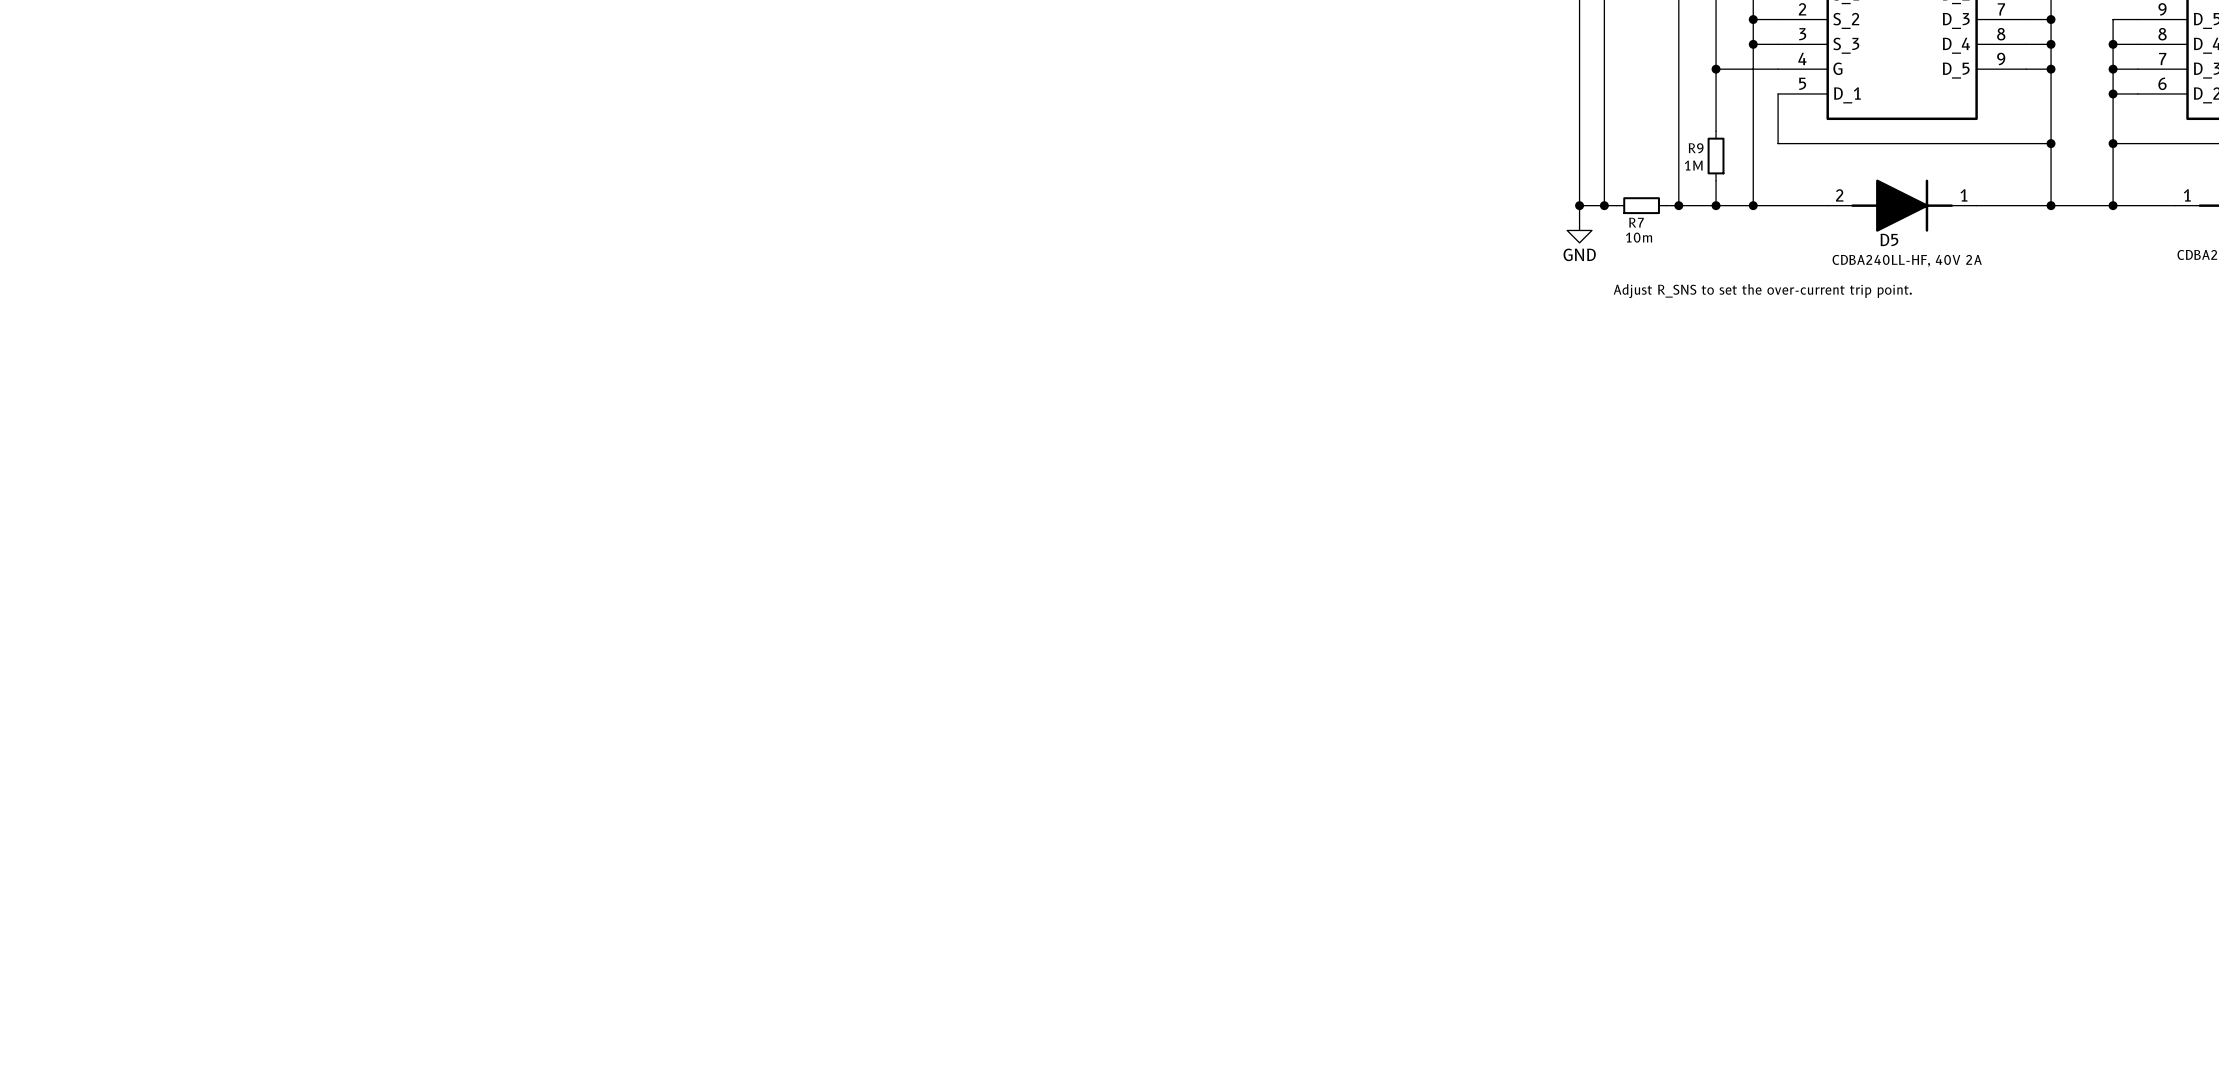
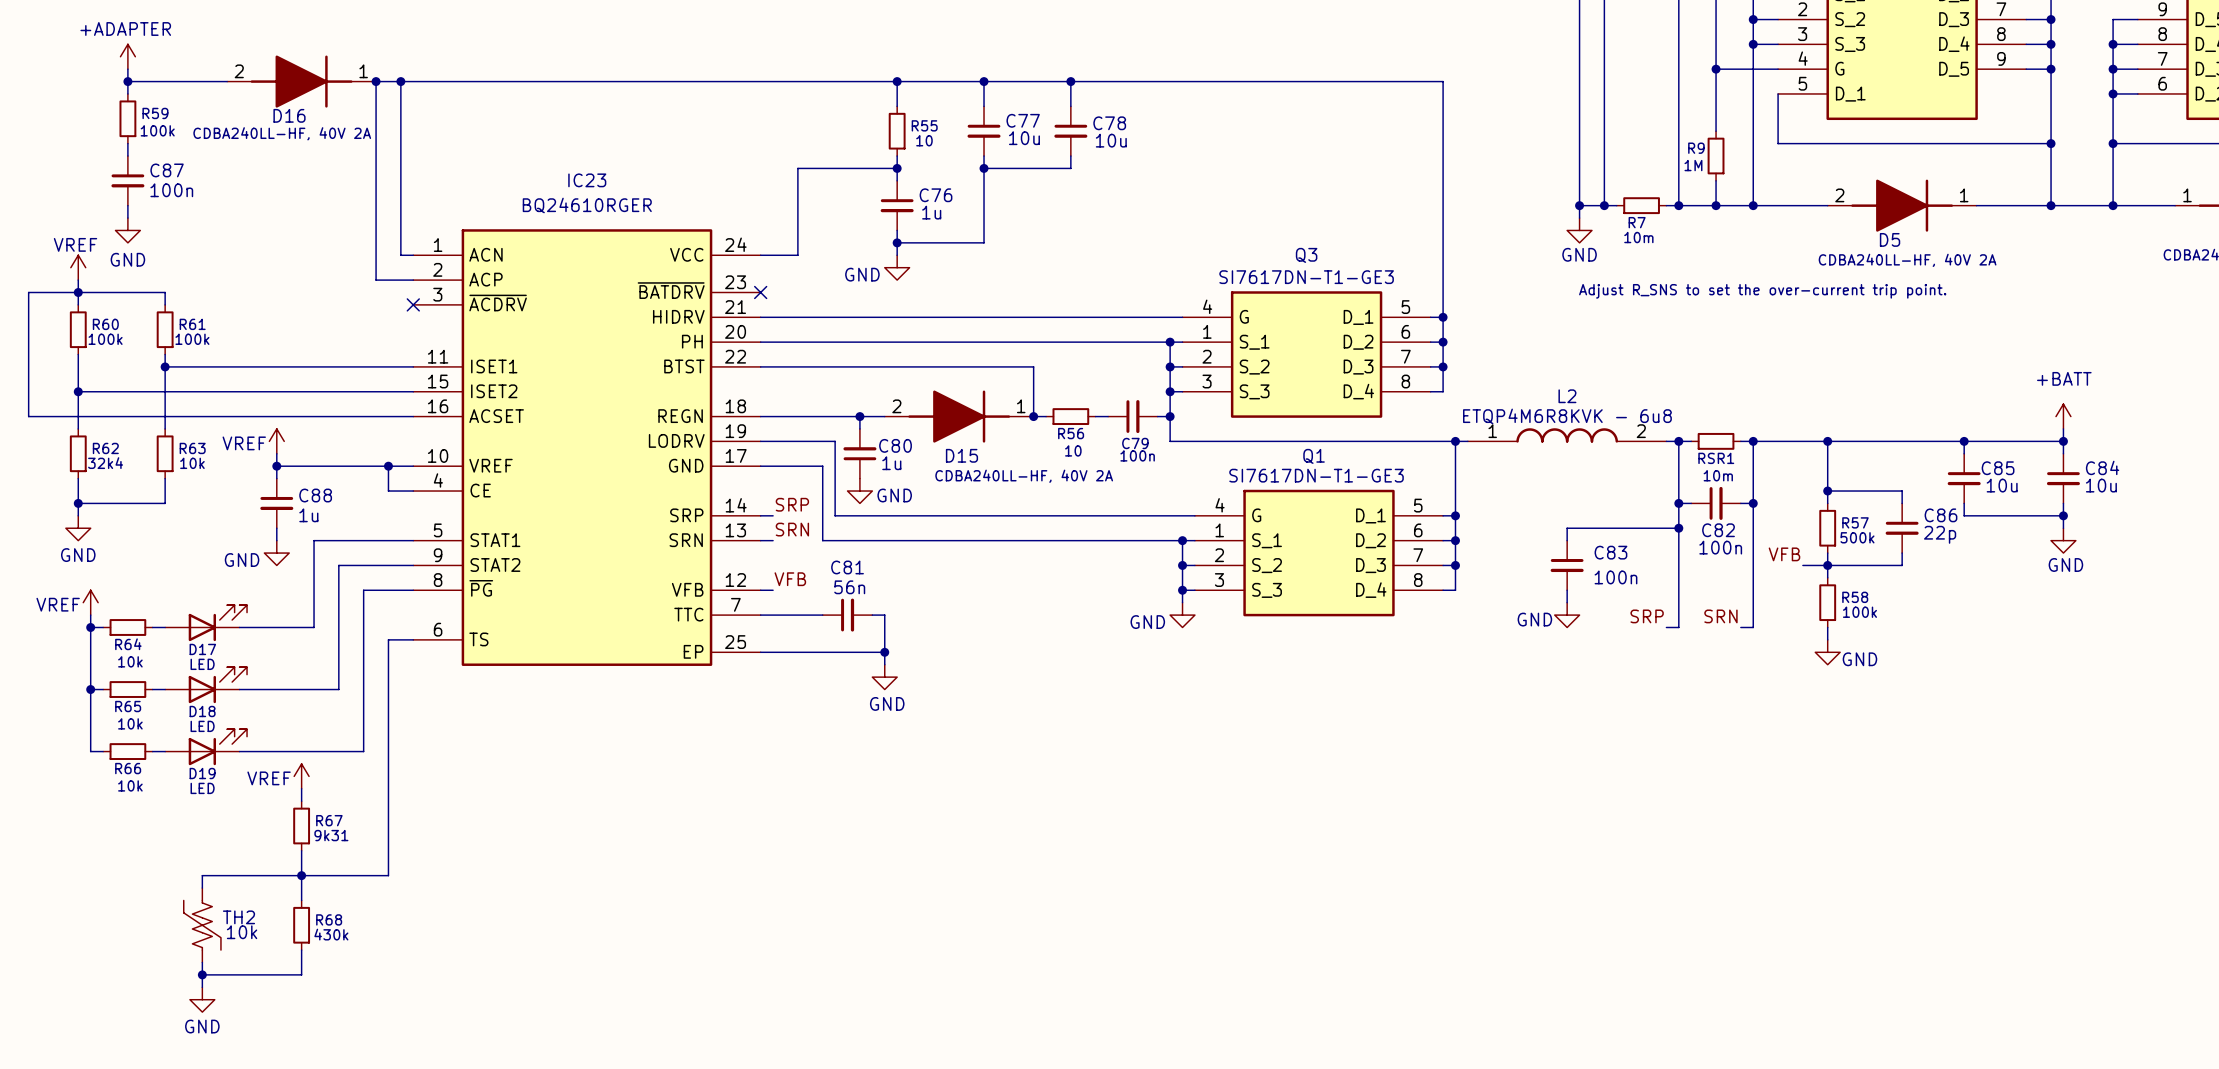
power symbol: none -> +ADAPTER (127, 56)
wire: none -> (127, 69) (127, 93)
wire: none -> (127, 81) (227, 81)
junction: none -> (127, 81)
D16: none -> CDBA240LL-HF, 40V 2A (301, 81)
junction: none -> (376, 81)
wire: none -> (400, 81) (400, 255) (413, 255)
junction: none -> (400, 81)
wire: none -> (897, 81) (897, 106)
junction: none -> (897, 81)
wire: none -> (984, 81) (984, 106)
junction: none -> (984, 81)
wire: none -> (1070, 81) (1070, 106)
junction: none -> (1070, 81)
R59: none -> 100k (127, 118)
R55: none -> 10 (897, 131)
C77: none -> 10u (984, 131)
C78: none -> 10u (1070, 131)
wire: none -> (127, 143) (127, 156)
wire: none -> (897, 156) (897, 180)
wire: none -> (984, 156) (984, 242) (897, 242)
wire: none -> (1070, 156) (1070, 168) (984, 168)
wire: none -> (897, 168) (797, 168) (797, 255) (760, 255)
junction: none -> (897, 168)
junction: none -> (984, 168)
C87: none -> 100n (127, 180)
wire: none -> (127, 205) (127, 218)
C76: none -> 1u (897, 205)
power symbol: none -> GND (127, 230)
wire: none -> (897, 230) (897, 255)
junction: none -> (897, 242)
power symbol: none -> VREF (78, 267)
power symbol: none -> GND (897, 267)
wire: none -> (78, 280) (78, 304)
wire: none -> (413, 280) (376, 280) (376, 81) (1443, 81) (1443, 391) (1430, 391)
junction: none -> (78, 292)
no-connect mark: none -> (760, 292)
wire: none -> (165, 304) (165, 292) (28, 292) (28, 416) (413, 416)
no-connect mark: none -> (413, 304)
wire: none -> (760, 317) (1182, 317)
wire: none -> (1430, 317) (1443, 317)
junction: none -> (1443, 317)
R60: none -> 100k (78, 329)
R61: none -> 100k (165, 329)
wire: none -> (760, 342) (1182, 342)
wire: none -> (1170, 342) (1170, 441) (1467, 441)
junction: none -> (1170, 342)
wire: none -> (1430, 342) (1443, 342)
junction: none -> (1443, 342)
wire: none -> (78, 354) (78, 428)
wire: none -> (165, 354) (165, 428)
Q3: none -> SI7617DN-T1-GE3 (1306, 354)
wire: none -> (165, 366) (413, 366)
junction: none -> (165, 366)
wire: none -> (760, 366) (1033, 366) (1033, 416) (1046, 416)
wire: none -> (1170, 366) (1182, 366)
junction: none -> (1170, 366)
wire: none -> (1430, 366) (1443, 366)
junction: none -> (1443, 366)
wire: none -> (78, 391) (413, 391)
junction: none -> (78, 391)
wire: none -> (1170, 391) (1182, 391)
junction: none -> (1170, 391)
wire: none -> (760, 416) (884, 416)
wire: none -> (859, 416) (859, 428)
junction: none -> (859, 416)
D15: none -> CDBA240LL-HF, 40V 2A (959, 416)
junction: none -> (1033, 416)
R56: none -> 10 (1070, 416)
wire: none -> (1095, 416) (1108, 416)
C79: none -> 100n (1132, 416)
wire: none -> (1157, 416) (1170, 416)
junction: none -> (1170, 416)
power symbol: none -> +BATT (2063, 416)
wire: none -> (2063, 428) (2063, 453)
L2: none -> ETQP4M6R8KVK - 6u8 (1567, 435)
power symbol: none -> VREF (276, 441)
wire: none -> (760, 441) (835, 441) (835, 515) (1194, 515)
wire: none -> (1455, 441) (1455, 590) (1443, 590)
junction: none -> (1455, 441)
wire: none -> (1666, 441) (1691, 441)
wire: none -> (1678, 441) (1678, 627) (1666, 627)
junction: none -> (1678, 441)
RSR1: none -> 10m (1716, 441)
wire: none -> (1740, 441) (2063, 441)
wire: none -> (1753, 441) (1753, 627) (1740, 627)
junction: none -> (1753, 441)
wire: none -> (1827, 441) (1827, 503)
junction: none -> (1827, 441)
wire: none -> (1964, 441) (1964, 453)
junction: none -> (1964, 441)
junction: none -> (2063, 441)
IC23: none -> BQ24610RGER (586, 447)
R62: none -> 32k4 (78, 453)
R63: none -> 10k (165, 453)
wire: none -> (276, 453) (276, 478)
C80: none -> 1u (859, 453)
wire: none -> (276, 466) (413, 466)
junction: none -> (276, 466)
wire: none -> (388, 466) (388, 491) (413, 491)
junction: none -> (388, 466)
wire: none -> (760, 466) (822, 466) (822, 540) (1194, 540)
wire: none -> (78, 478) (78, 515)
wire: none -> (165, 478) (165, 503) (78, 503)
C85: none -> 10u (1964, 478)
C84: none -> 10u (2063, 478)
power symbol: none -> GND (859, 491)
wire: none -> (1827, 491) (1902, 491) (1902, 503)
junction: none -> (1827, 491)
junction: none -> (78, 503)
C88: none -> 1u (276, 503)
wire: none -> (1678, 503) (1691, 503)
junction: none -> (1678, 503)
C82: none -> 100n (1716, 503)
wire: none -> (1740, 503) (1753, 503)
junction: none -> (1753, 503)
wire: none -> (1964, 503) (1964, 515) (2063, 515)
wire: none -> (2063, 503) (2063, 528)
label: none -> SRP (792, 504)
wire: none -> (760, 515) (773, 515)
wire: none -> (1443, 515) (1455, 515)
junction: none -> (1455, 515)
junction: none -> (2063, 515)
power symbol: none -> GND (78, 528)
wire: none -> (276, 528) (276, 540)
wire: none -> (1678, 528) (1567, 528) (1567, 540)
junction: none -> (1678, 528)
R57: none -> 500k (1827, 528)
C86: none -> 22p (1902, 528)
label: none -> SRN (792, 529)
wire: none -> (413, 540) (314, 540) (314, 627) (239, 627)
wire: none -> (760, 540) (773, 540)
wire: none -> (1182, 540) (1182, 602)
junction: none -> (1182, 540)
wire: none -> (1443, 540) (1455, 540)
junction: none -> (1455, 540)
power symbol: none -> GND (2063, 540)
power symbol: none -> GND (276, 553)
Q1: none -> SI7617DN-T1-GE3 (1319, 553)
wire: none -> (1827, 553) (1827, 577)
wire: none -> (1902, 553) (1902, 565) (1802, 565)
label: none -> VFB (1784, 554)
wire: none -> (413, 565) (338, 565) (338, 689) (239, 689)
wire: none -> (1182, 565) (1194, 565)
junction: none -> (1182, 565)
wire: none -> (1443, 565) (1455, 565)
junction: none -> (1455, 565)
C83: none -> 100n (1567, 565)
junction: none -> (1827, 565)
label: none -> VFB (790, 579)
wire: none -> (413, 590) (363, 590) (363, 751) (239, 751)
wire: none -> (760, 590) (773, 590)
wire: none -> (1182, 590) (1194, 590)
junction: none -> (1182, 590)
wire: none -> (1567, 590) (1567, 602)
power symbol: none -> VREF (90, 602)
R58: none -> 100k (1827, 602)
wire: none -> (90, 615) (90, 751) (103, 751)
wire: none -> (760, 615) (822, 615)
C81: none -> 56n (847, 615)
wire: none -> (872, 615) (884, 615) (884, 664)
power symbol: none -> GND (1182, 615)
power symbol: none -> GND (1567, 615)
label: none -> SRP (1647, 616)
label: none -> SRN (1720, 616)
D17: none -> LED (206, 623)
wire: none -> (90, 627) (103, 627)
junction: none -> (90, 627)
R64: none -> 10k (127, 627)
wire: none -> (152, 627) (165, 627)
wire: none -> (1827, 627) (1827, 639)
wire: none -> (413, 639) (388, 639) (388, 875) (202, 875) (202, 888)
wire: none -> (760, 652) (884, 652)
junction: none -> (884, 652)
power symbol: none -> GND (1827, 652)
power symbol: none -> GND (884, 677)
D18: none -> LED (206, 685)
wire: none -> (90, 689) (103, 689)
junction: none -> (90, 689)
R65: none -> 10k (127, 689)
wire: none -> (152, 689) (165, 689)
D19: none -> LED (206, 747)
R66: none -> 10k (127, 751)
wire: none -> (152, 751) (165, 751)
power symbol: none -> VREF (301, 776)
wire: none -> (301, 788) (301, 801)
R67: none -> 9k31 (301, 826)
wire: none -> (301, 850) (301, 900)
junction: none -> (301, 875)
TH2: none -> 10k (202, 925)
R68: none -> 430k (301, 925)
wire: none -> (301, 950) (301, 974) (202, 974)
wire: none -> (202, 962) (202, 987)
junction: none -> (202, 974)
power symbol: none -> GND (202, 999)

